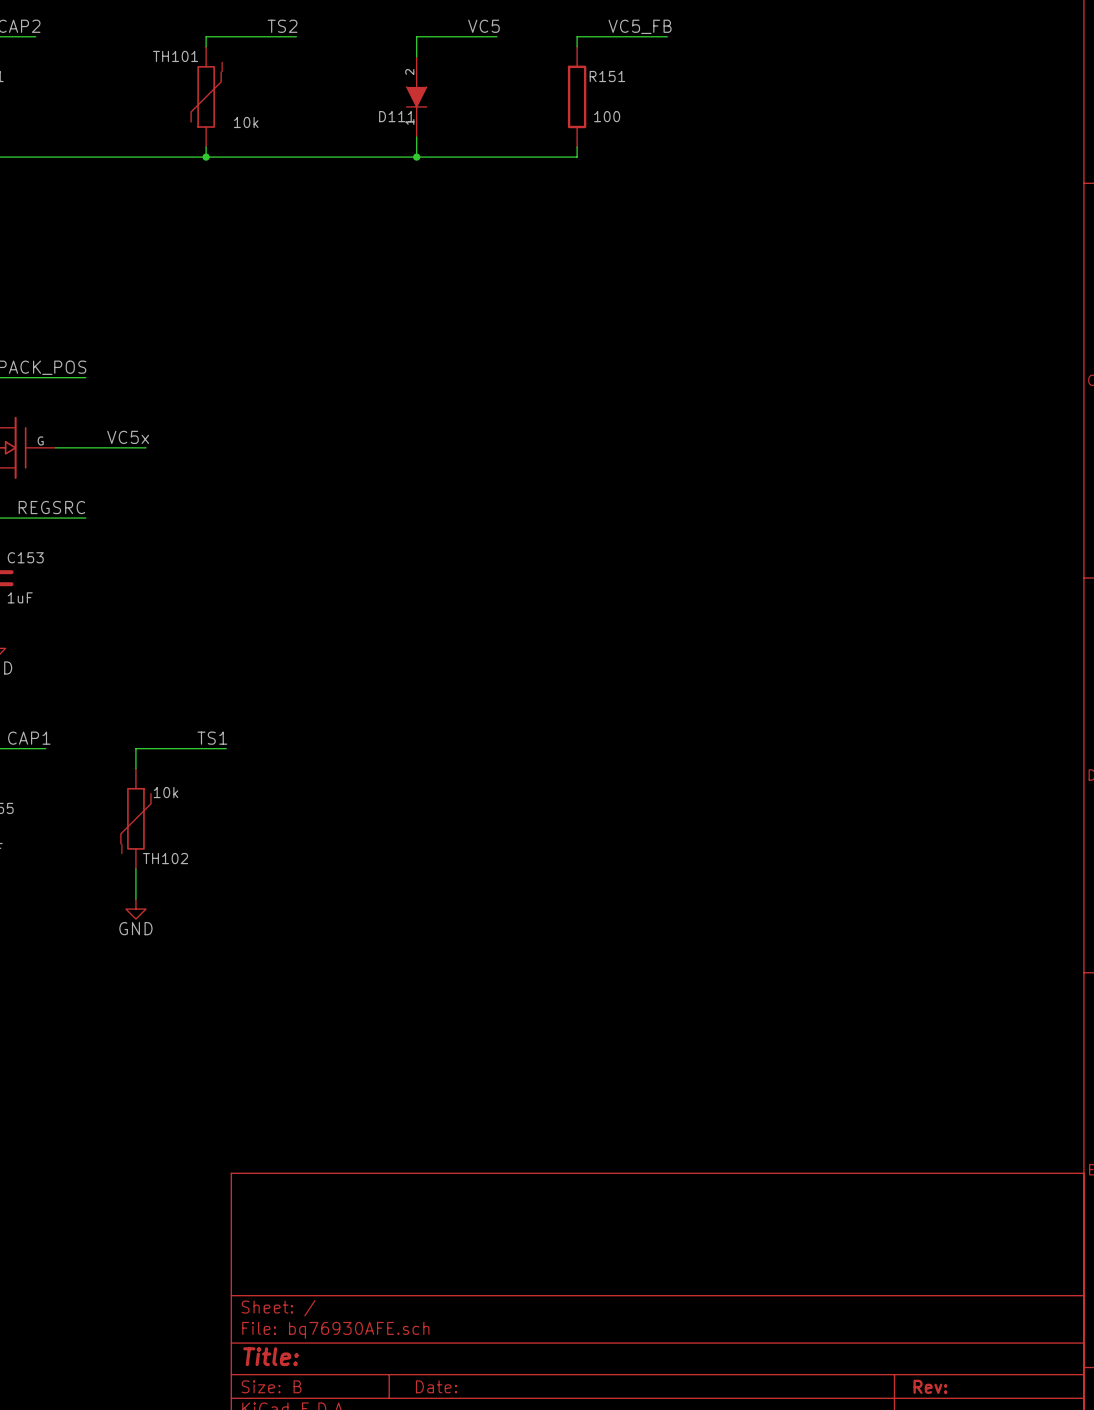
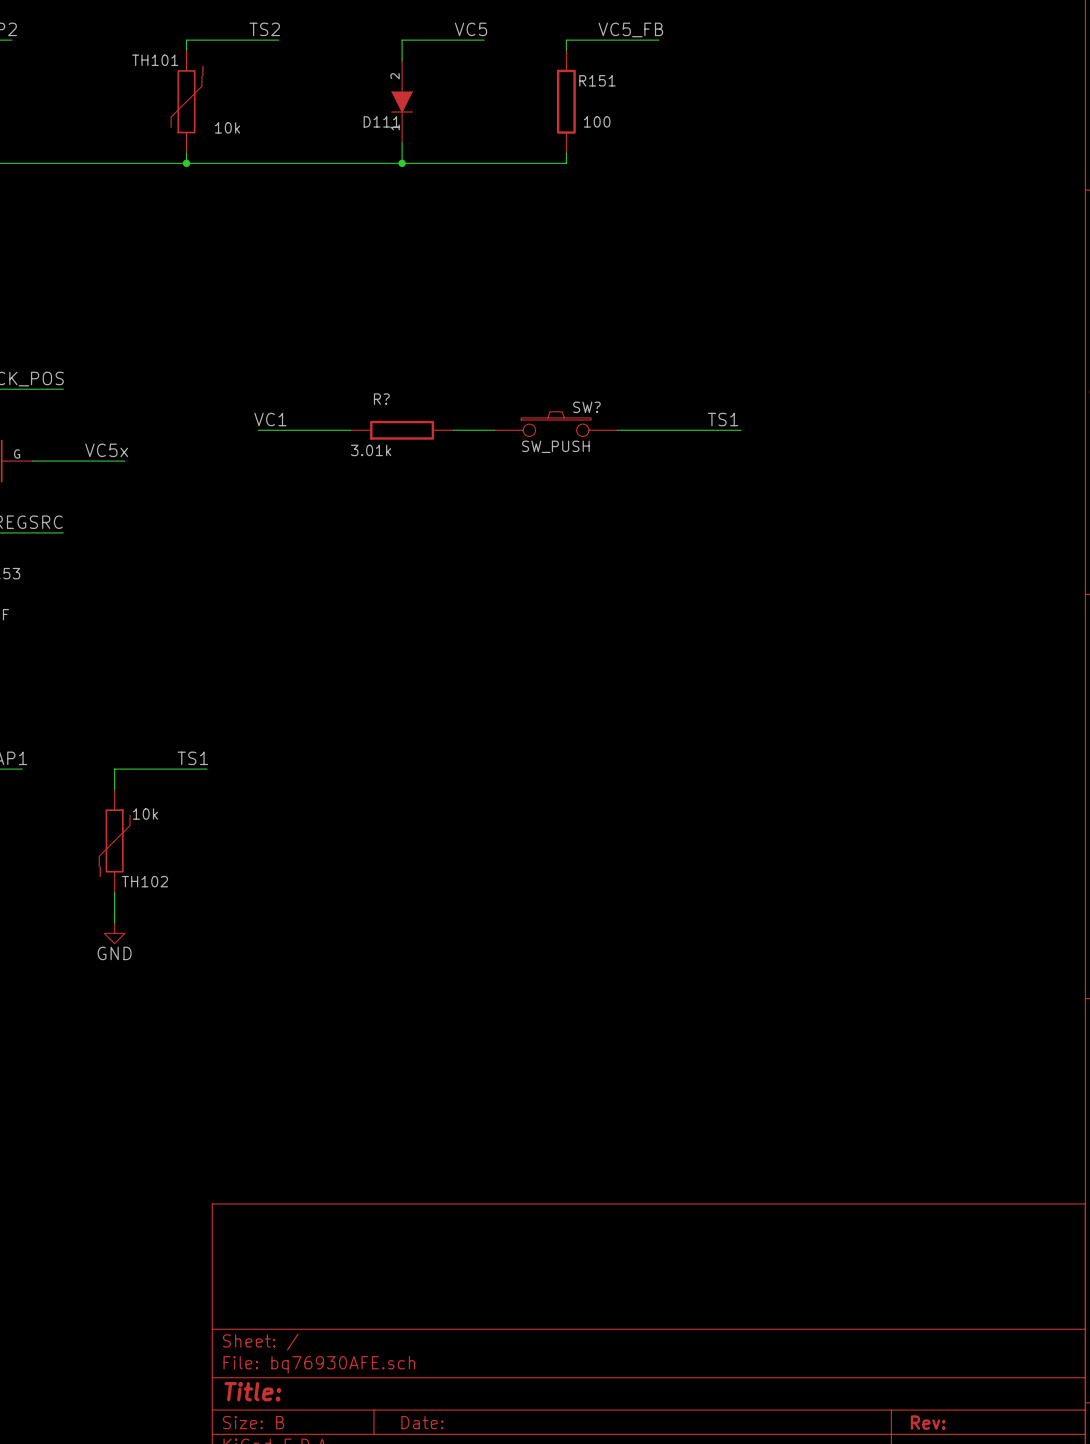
label: none -> VC1 (270, 419)
label: none -> TS1 (723, 419)
SW?: none -> SW_PUSH (556, 424)
wire: none -> (258, 430) (350, 430)
R?: none -> 3.01k (402, 430)
wire: none -> (453, 430) (494, 430)
wire: none -> (617, 430) (740, 430)

